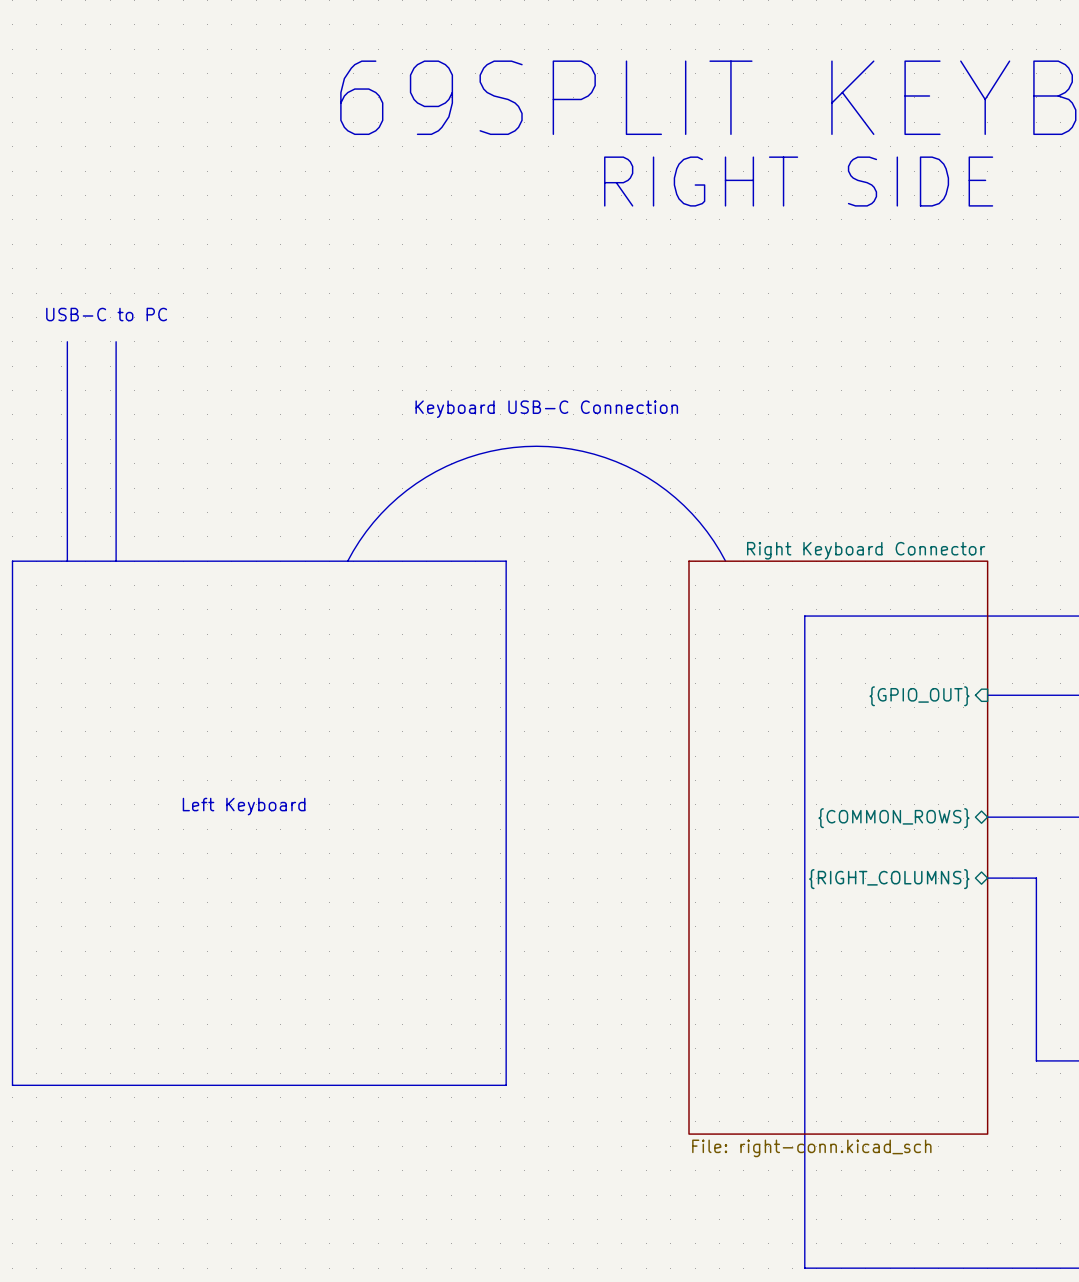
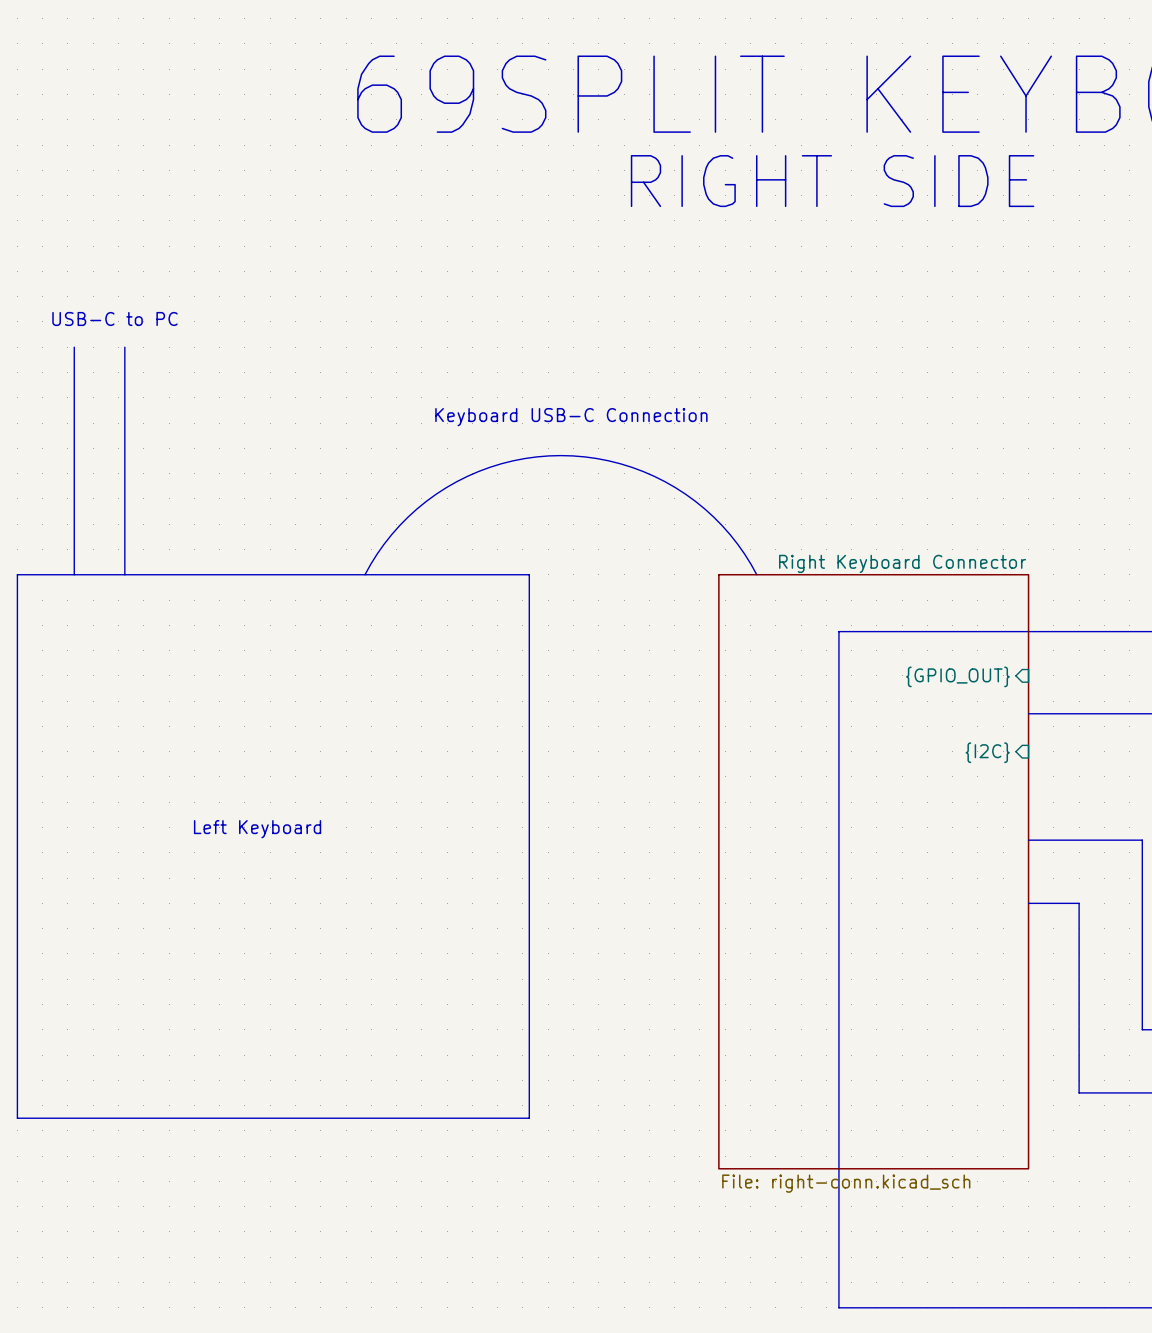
sheet pin position: {GPIO_OUT} (919, 696) -> {GPIO_OUT} (957, 676)
sheet pin: none -> {I2C} (987, 752)
sheet pin: {COMMON_ROWS} (893, 818) -> none
sheet pin: {RIGHT_COLUMNS} (889, 879) -> none

